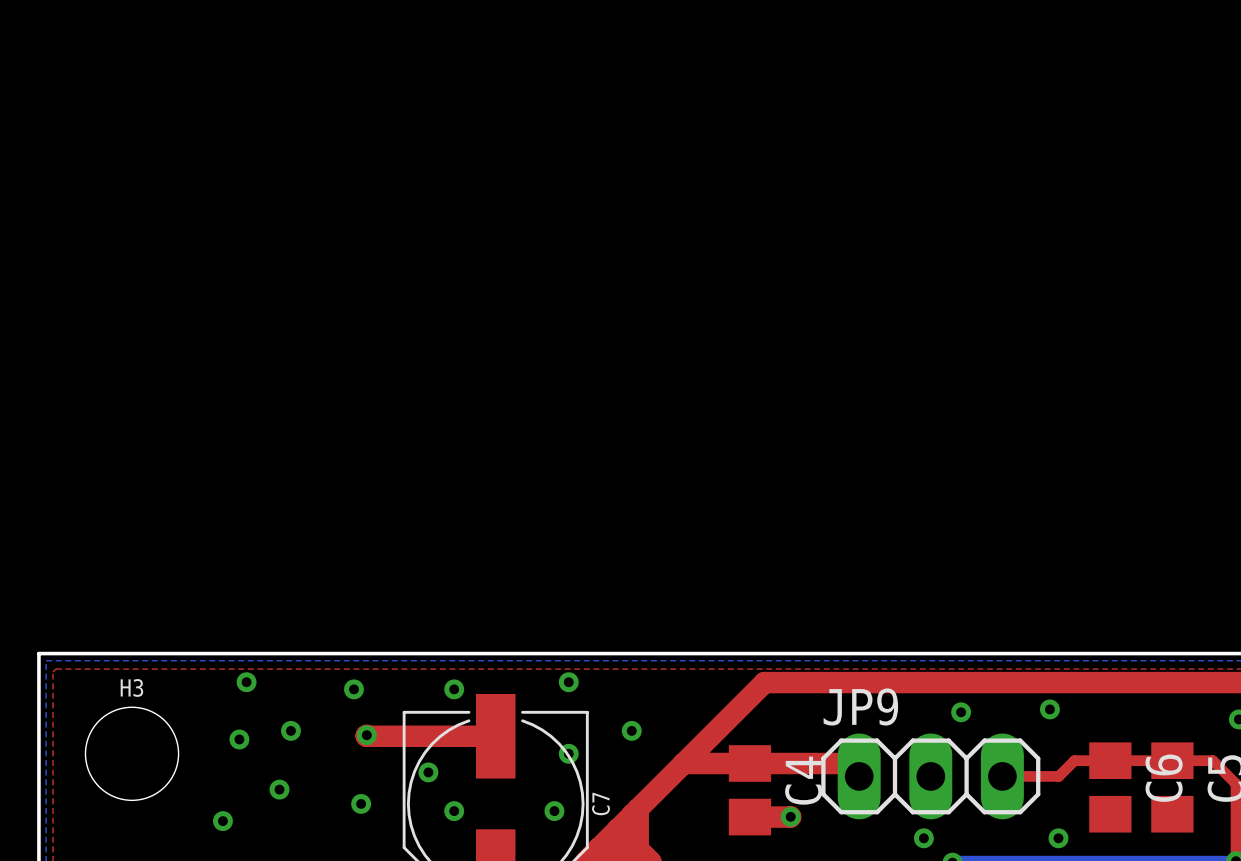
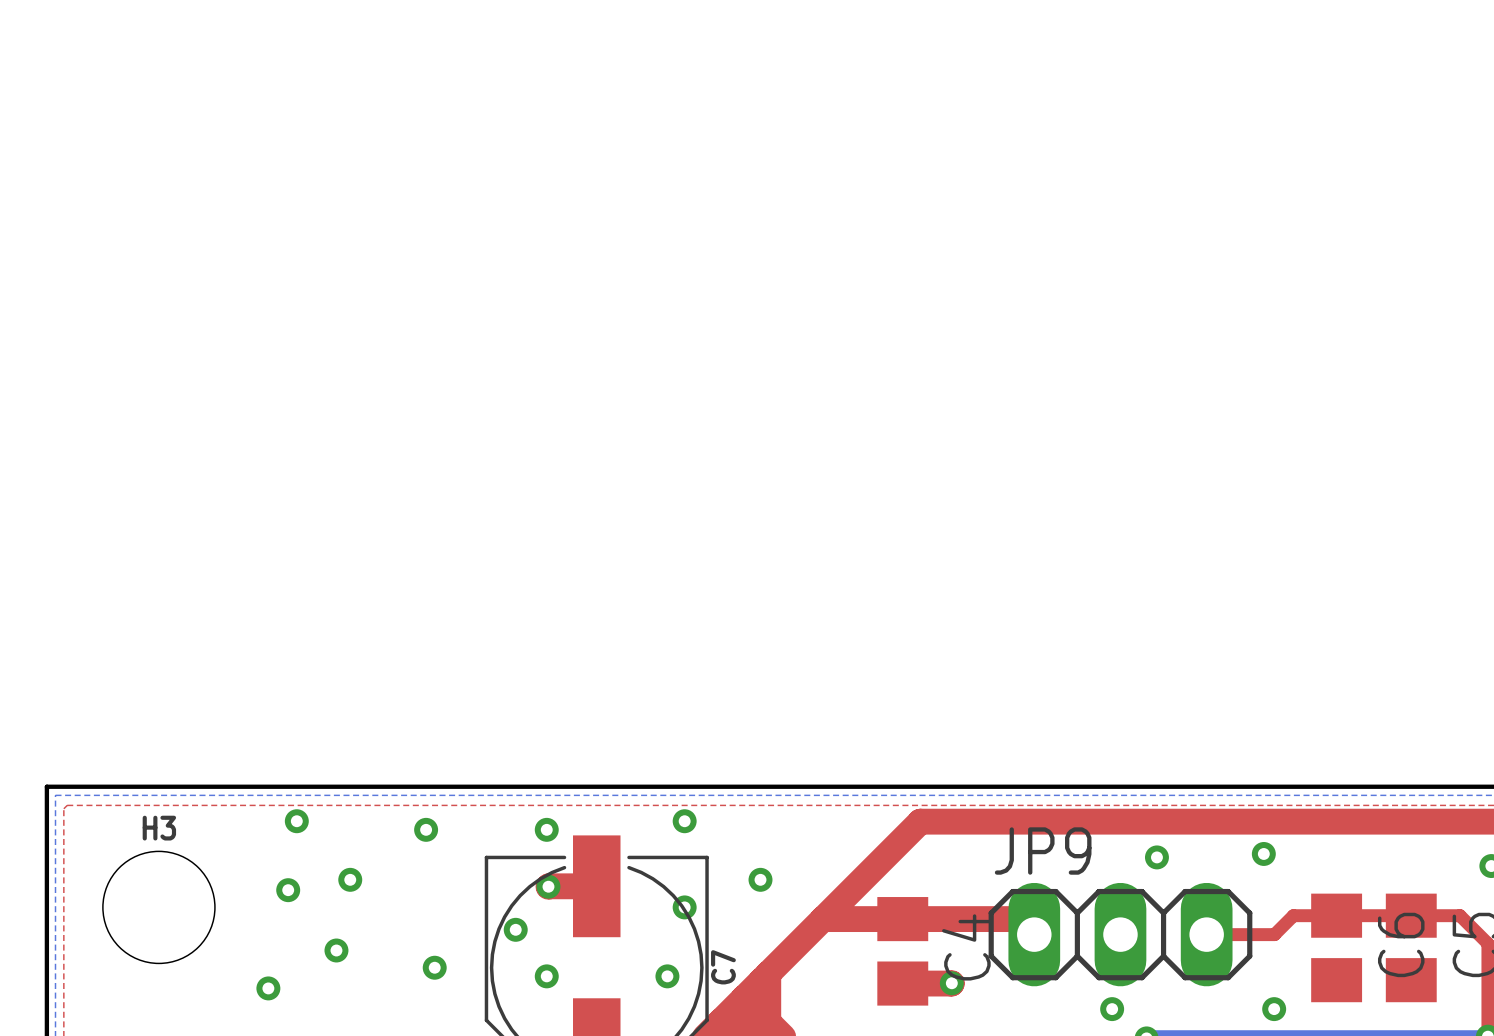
top track: (366, 735) (455, 736) -> none
via position: (366, 735) -> (548, 886)

